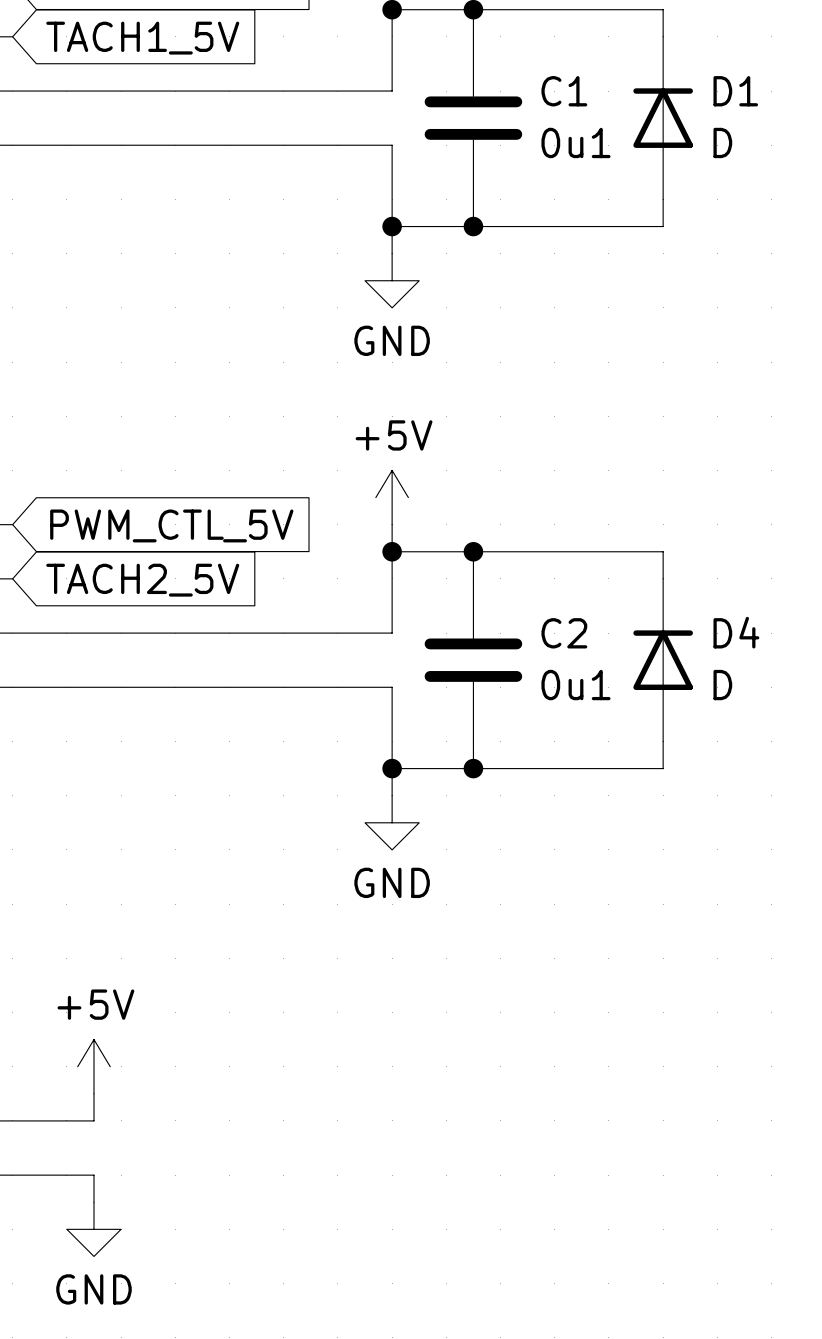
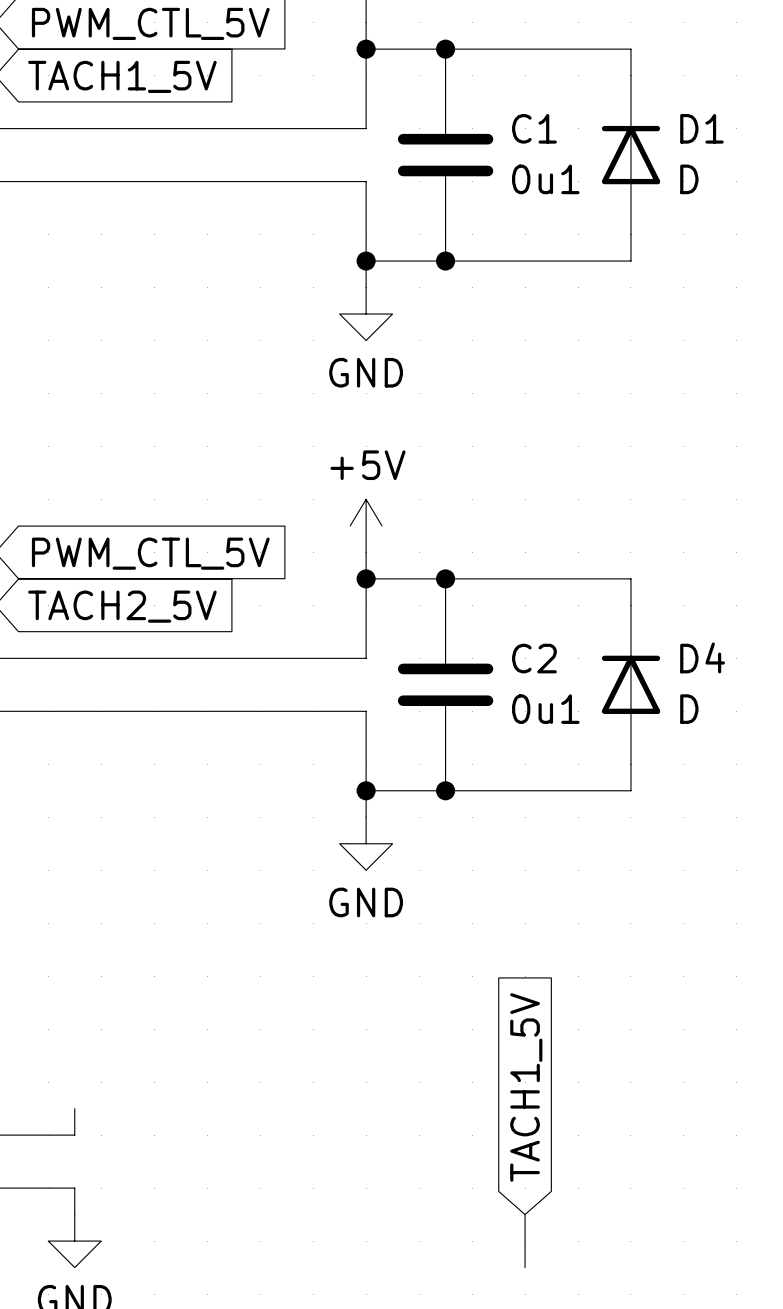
power symbol: +5V (93, 1066) -> none
global label: none -> TACH1_5V (526, 1087)
wire: none -> (525, 1214) (525, 1267)

